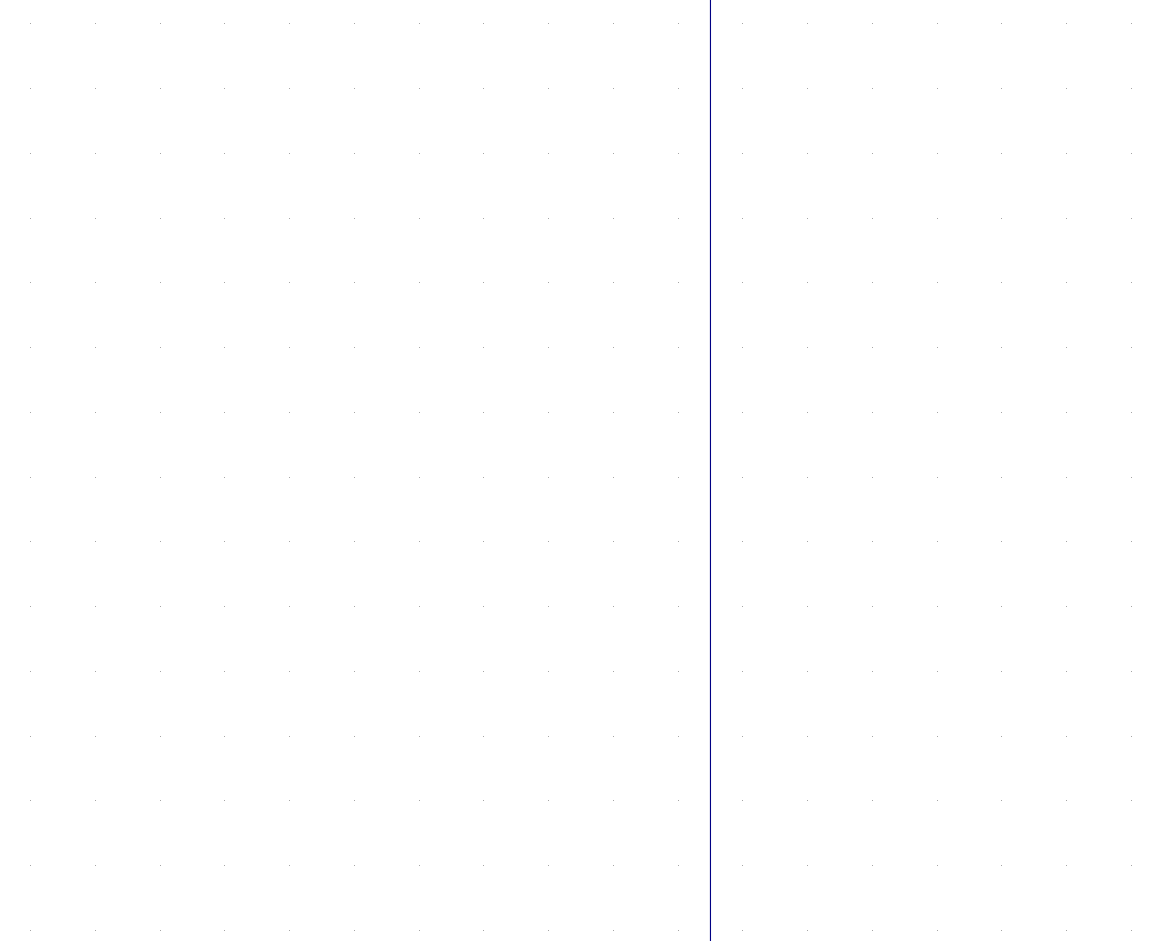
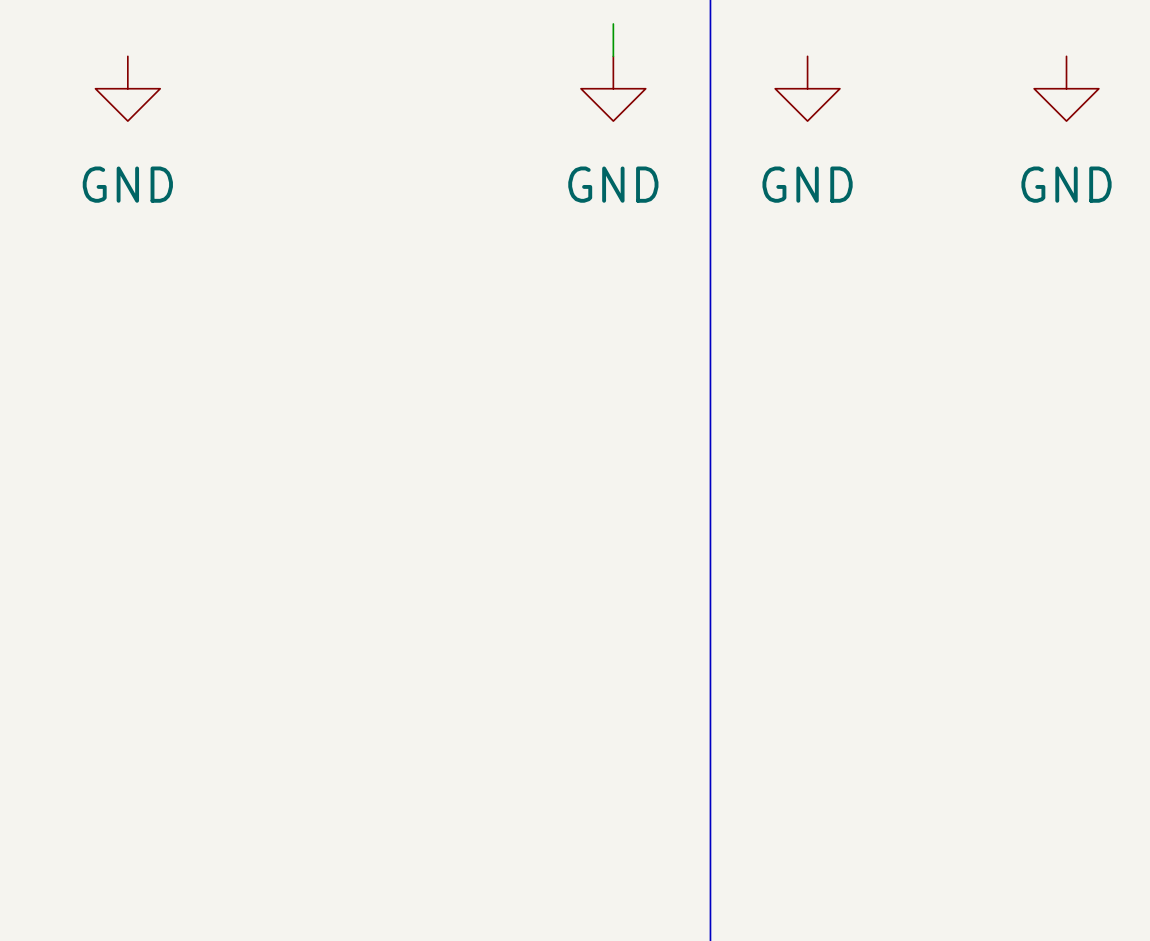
wire: none -> (613, 23) (613, 56)
power symbol: none -> GND (127, 88)
power symbol: none -> GND (613, 88)
power symbol: none -> GND (807, 88)
power symbol: none -> GND (1066, 88)

